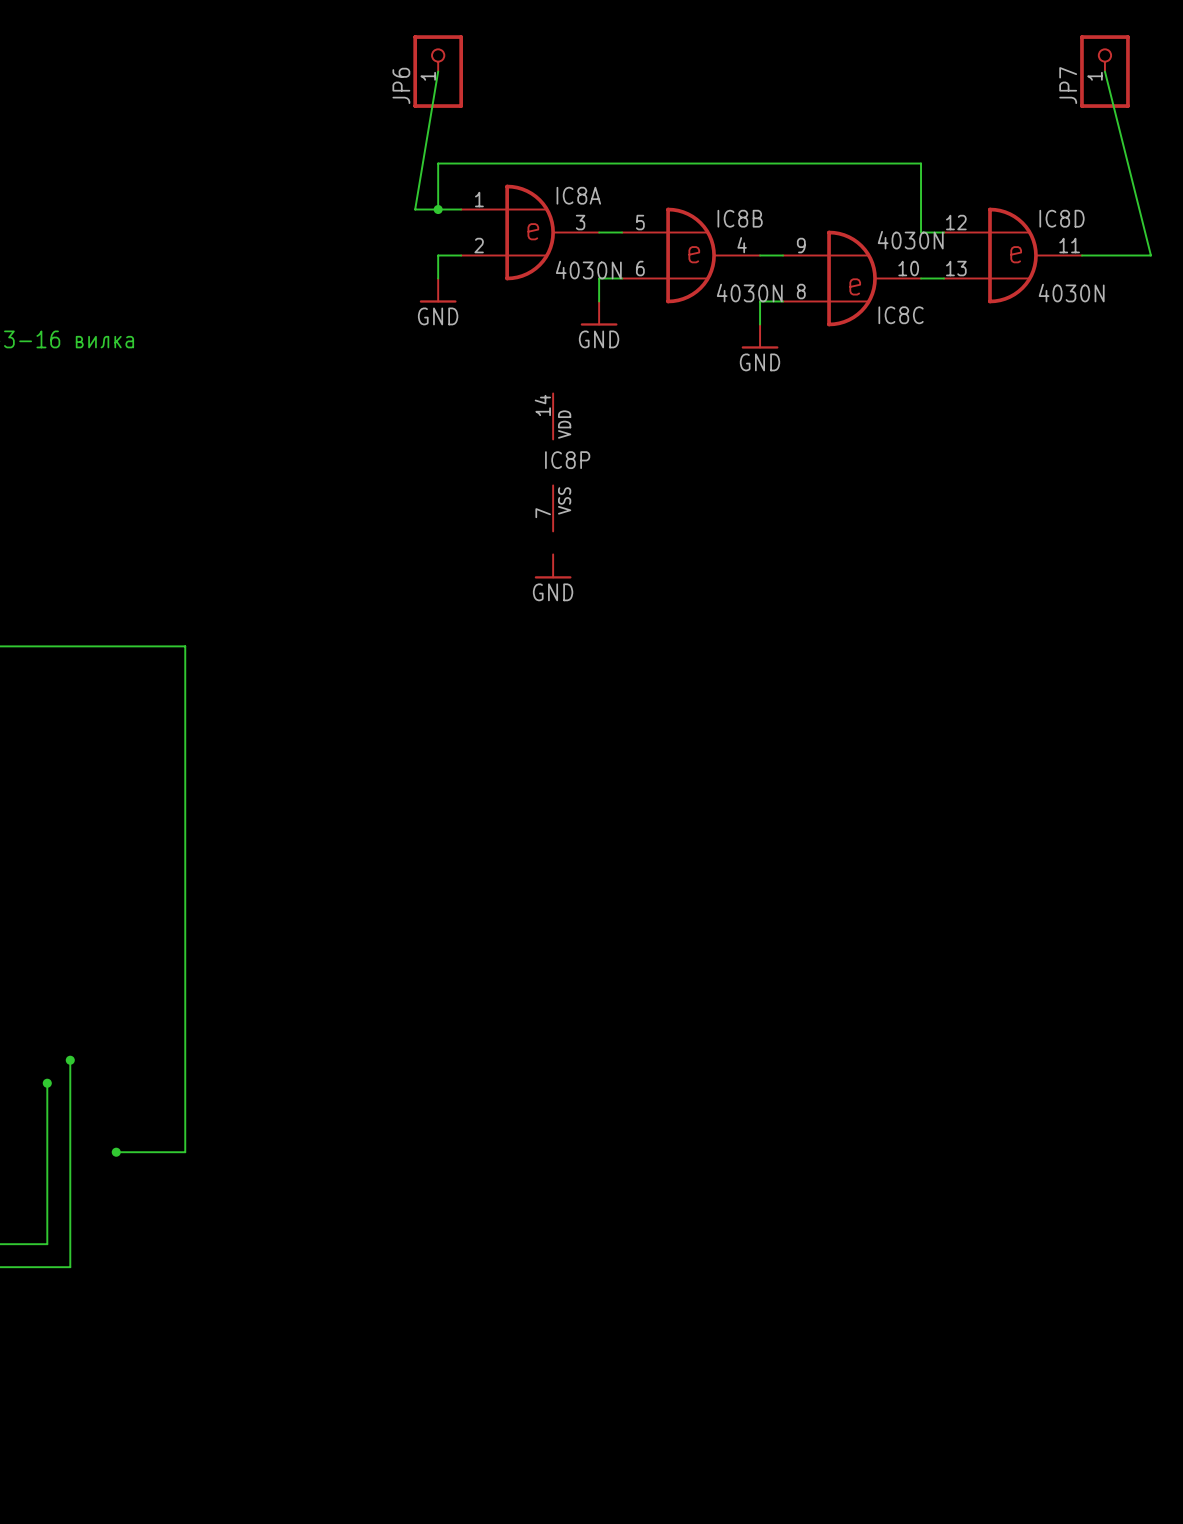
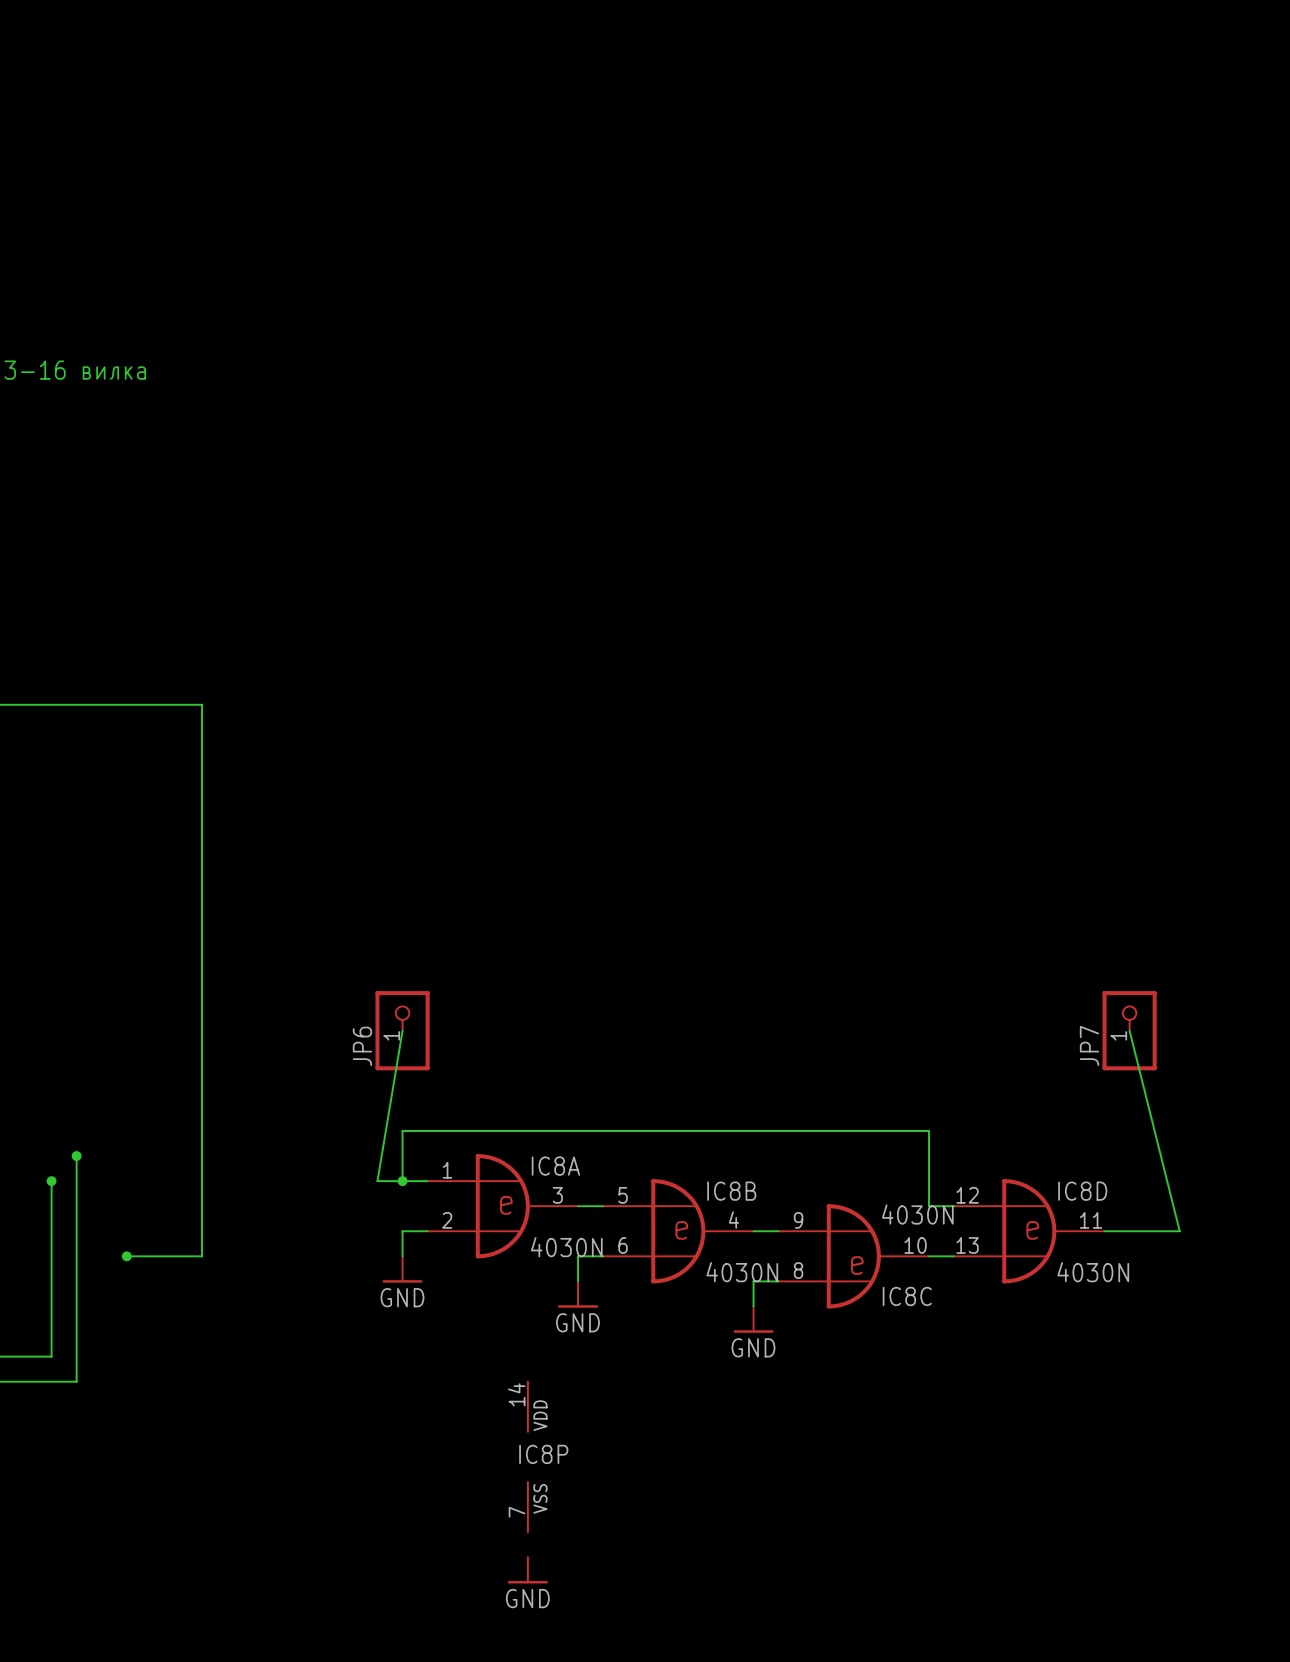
wire: (438, 71) (415, 209) (461, 209) -> none
JP6 position: (438, 71) -> (402, 1030)
wire: (1104, 71) (1150, 255) (1081, 255) -> none
JP7 position: (1104, 71) -> (1129, 1030)
wire: (438, 209) (438, 163) (921, 163) (921, 232) (944, 232) -> none
junction: (438, 209) -> none
IC8A position: (530, 232) -> (502, 1206)
wire: (599, 232) (622, 232) -> none
wire: (461, 255) (438, 255) (438, 278) -> none
IC8B position: (691, 255) -> (678, 1231)
wire: (760, 255) (783, 255) -> none
IC8D position: (1012, 255) -> (1029, 1231)
wire: (622, 278) (599, 278) (599, 301) -> none
IC8C position: (852, 278) -> (853, 1256)
wire: (921, 278) (944, 278) -> none
power symbol: GND (438, 290) -> none
wire: (783, 301) (760, 301) (760, 324) -> none
power symbol: GND (599, 313) -> none
power symbol: GND (760, 336) -> none
IC8P position: (553, 462) -> (527, 1456)
power symbol: GND (553, 566) -> none
wire: none -> (402, 1030) (377, 1181) (427, 1181)
wire: none -> (1129, 1030) (1179, 1231) (1104, 1231)
wire: none -> (402, 1181) (402, 1130) (929, 1130) (929, 1206) (954, 1206)
junction: none -> (402, 1181)
wire: none -> (578, 1206) (603, 1206)
wire: none -> (427, 1231) (402, 1231) (402, 1256)
wire: none -> (753, 1231) (778, 1231)
wire: none -> (603, 1256) (578, 1256) (578, 1281)
wire: none -> (929, 1256) (954, 1256)
power symbol: none -> GND (402, 1269)
wire: none -> (778, 1281) (753, 1281) (753, 1306)
power symbol: none -> GND (578, 1294)
power symbol: none -> GND (753, 1319)
power symbol: none -> GND (527, 1570)

